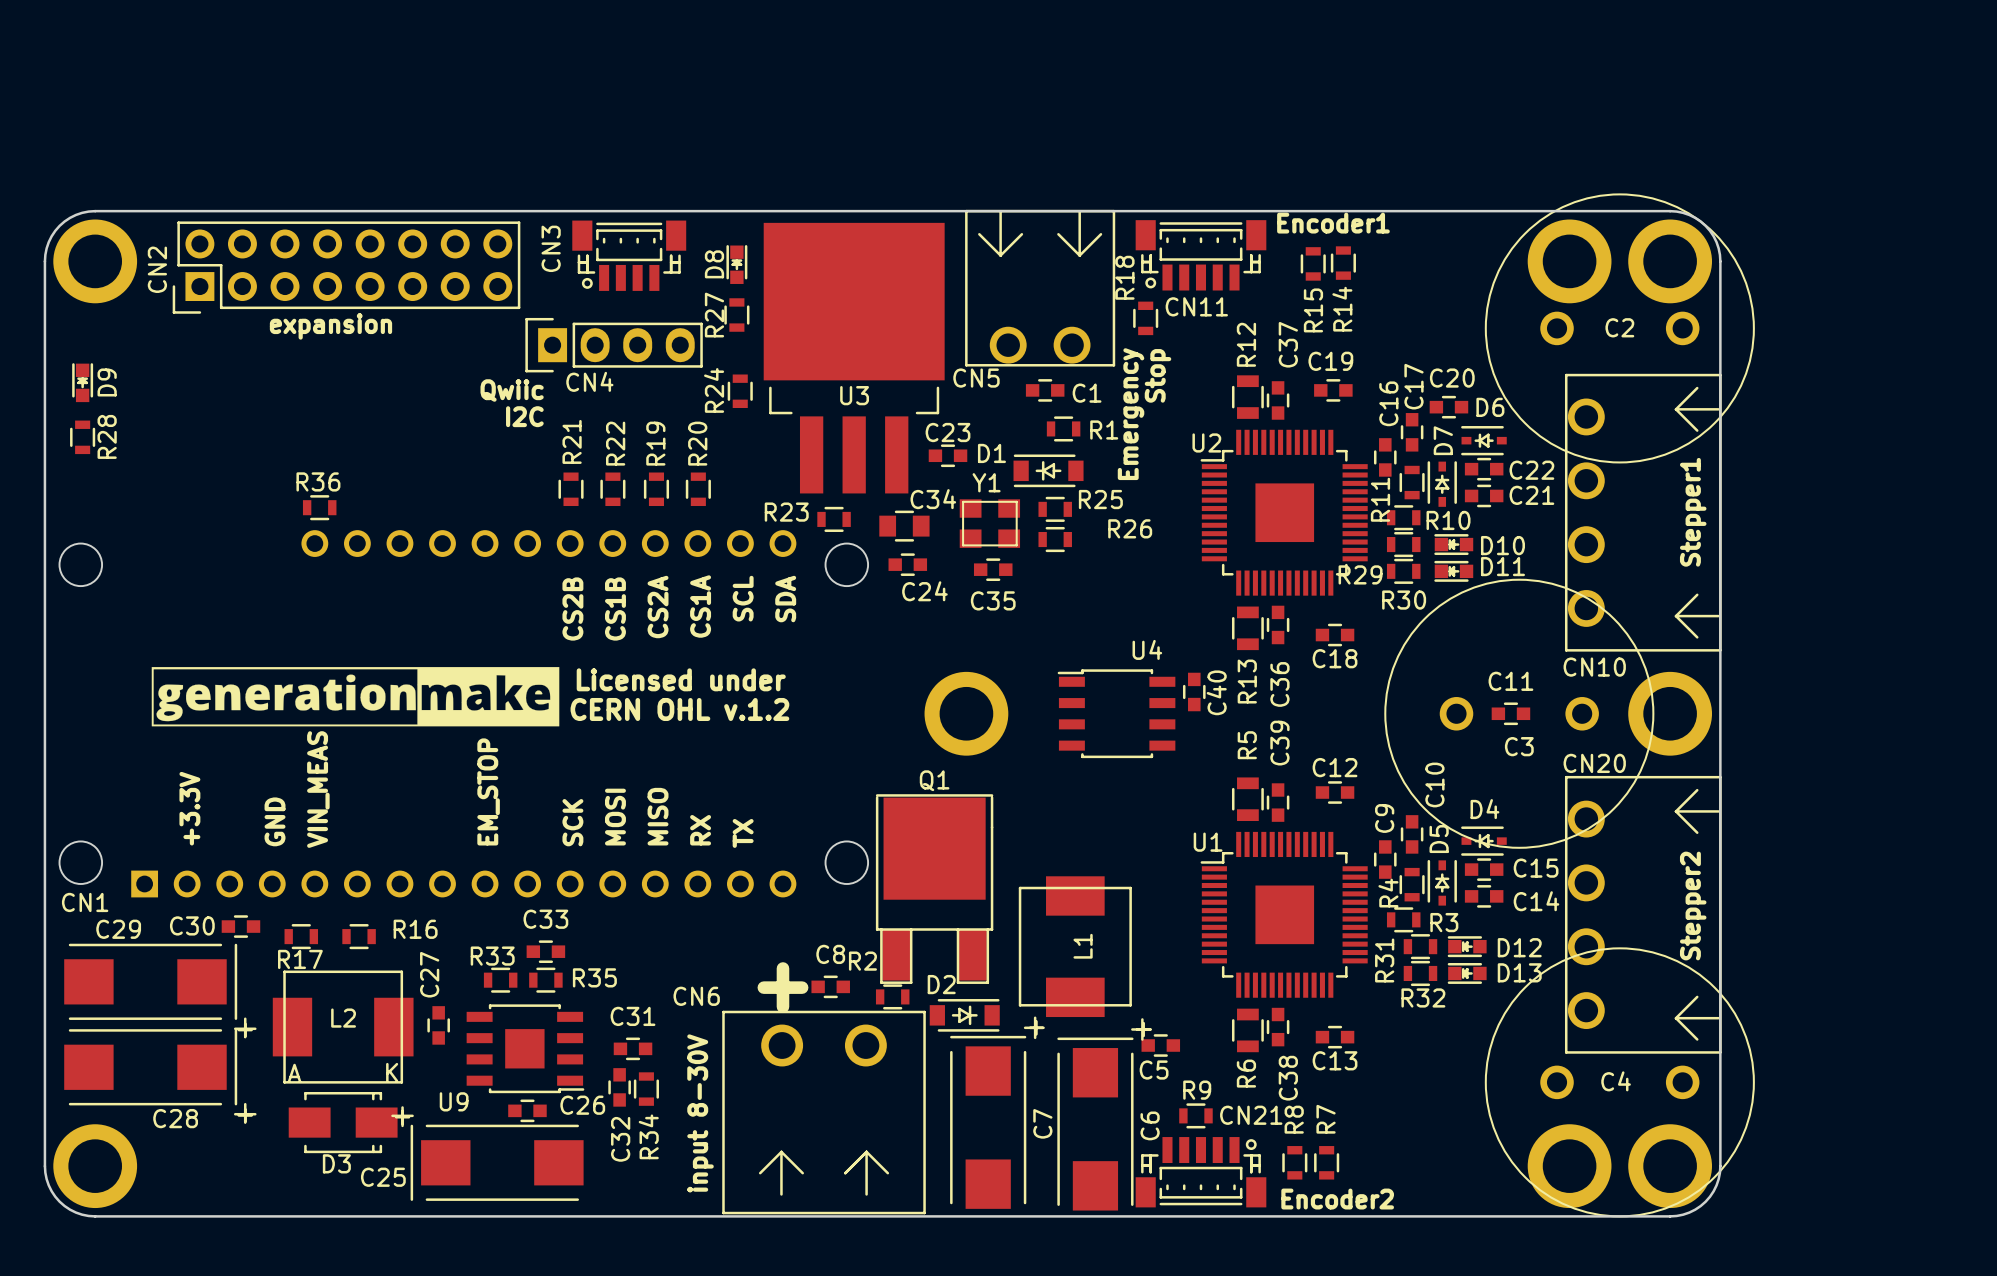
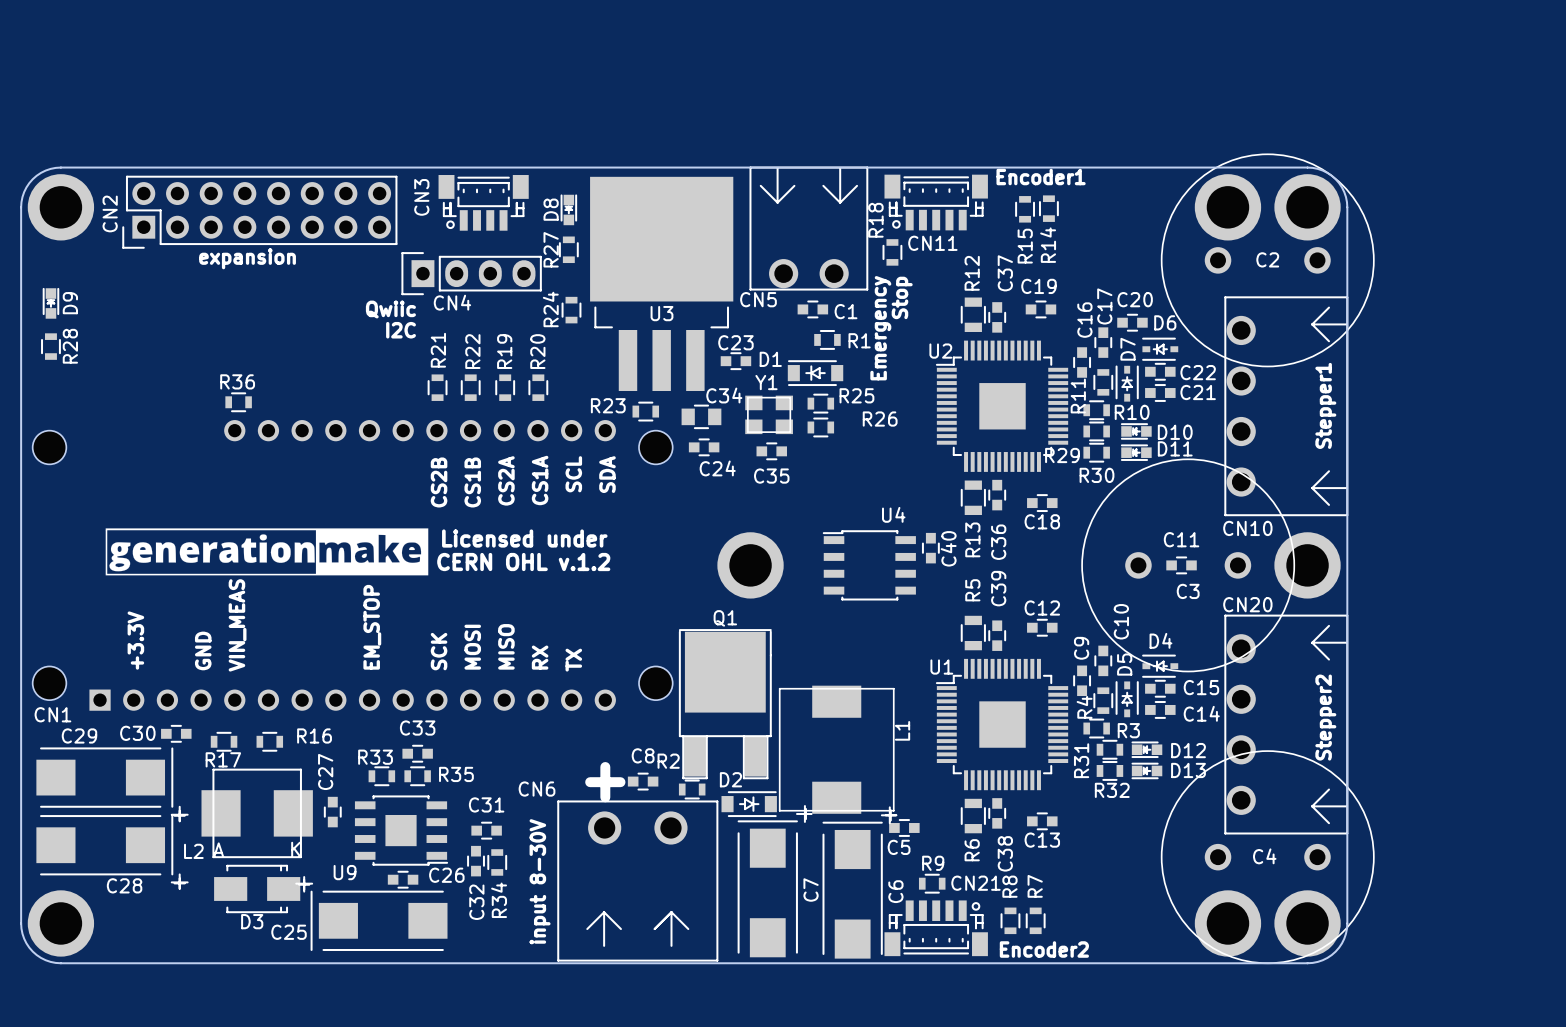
L1 footprint: [1018, 876, 1132, 1018] -> [778, 685, 895, 814]
L1 name position: L1 (1083, 946) -> L1 (902, 730)
L2 footprint: [272, 970, 414, 1084] -> [201, 768, 313, 859]
L2 name position: L2 (343, 1018) -> L2 (193, 851)

